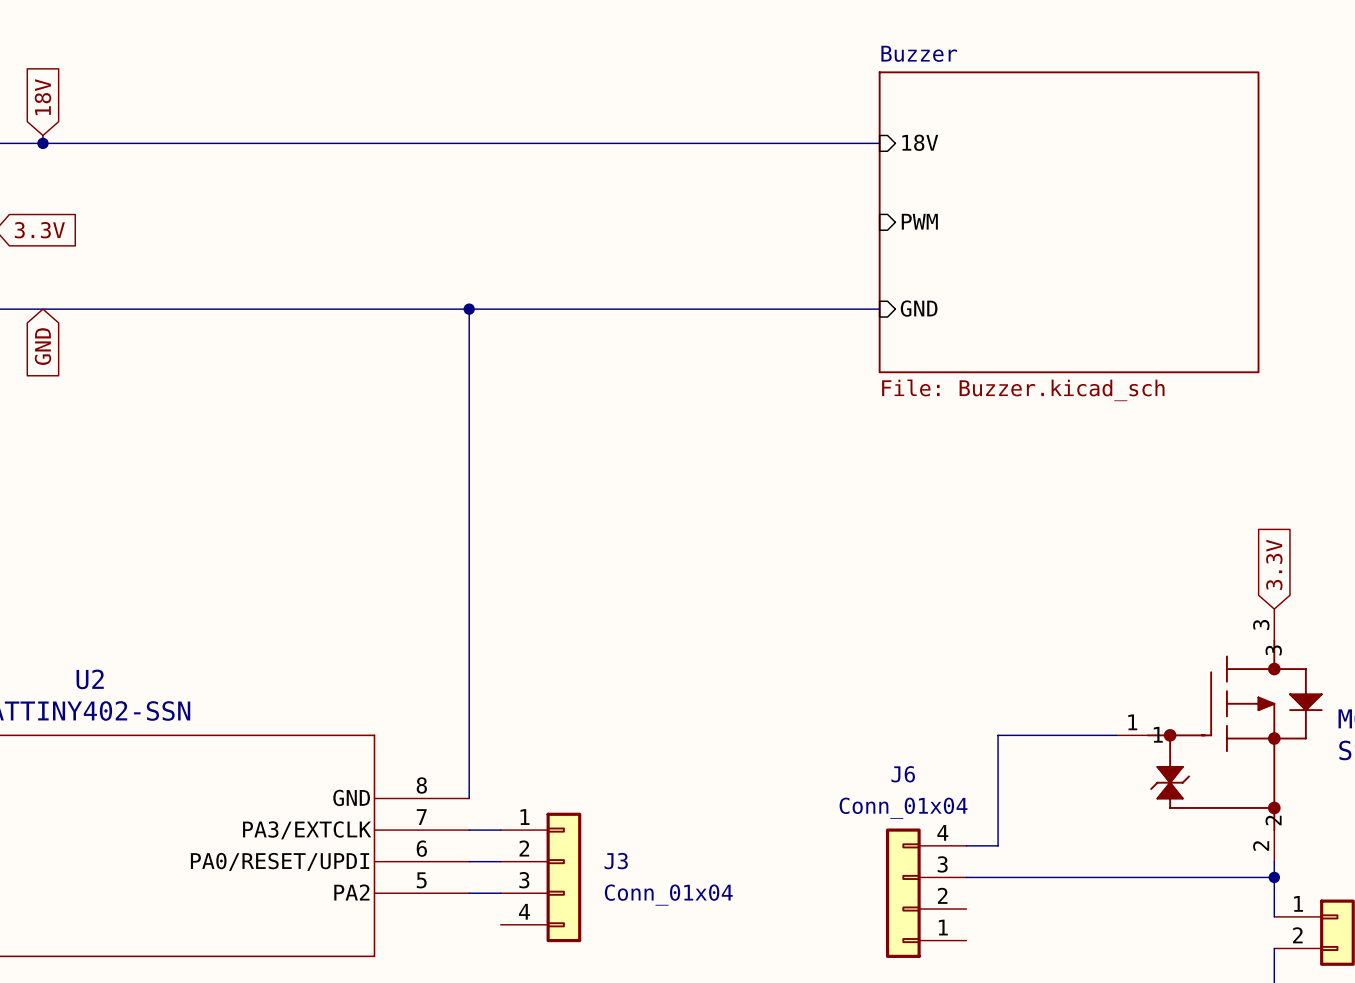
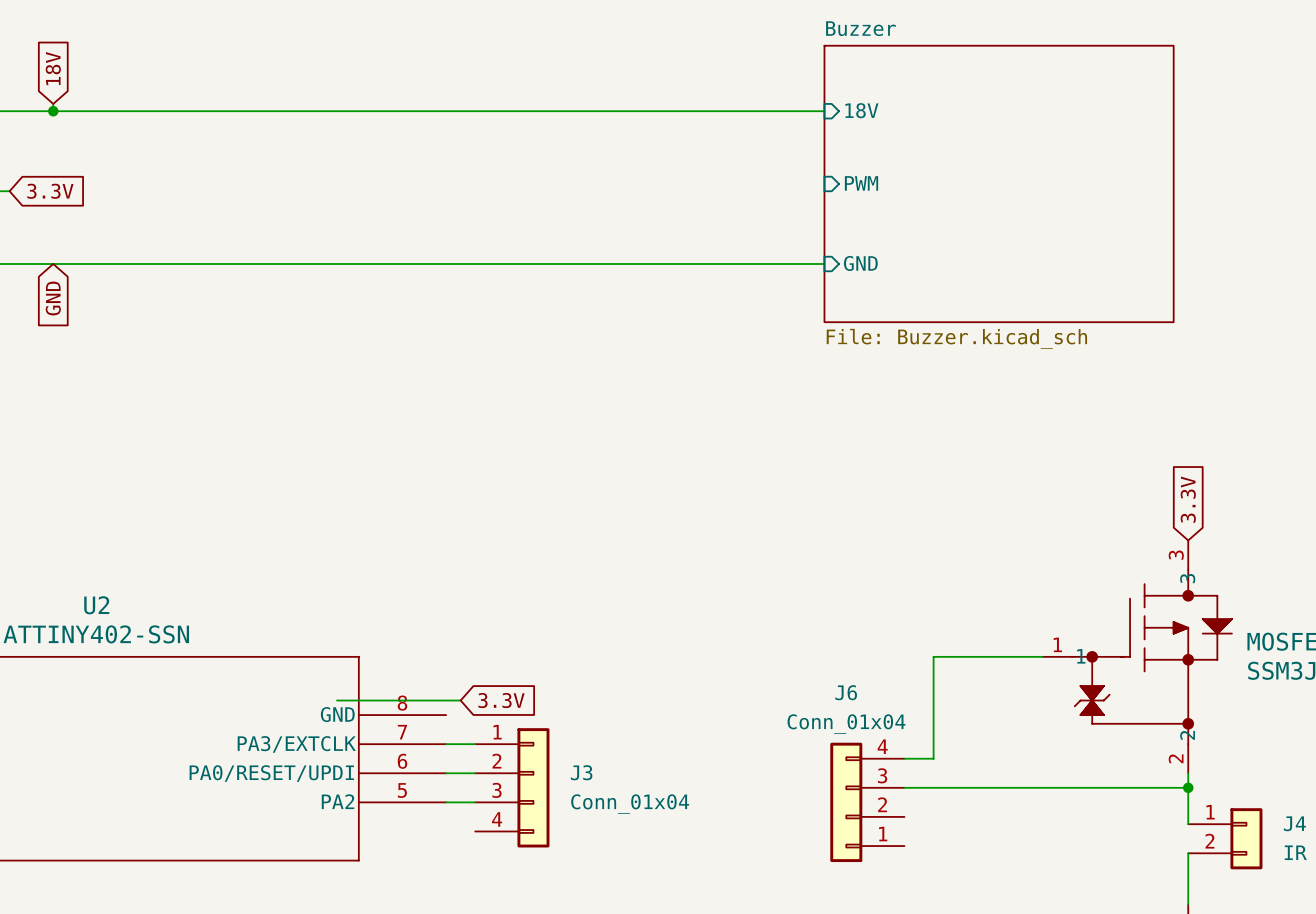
wire: (469, 309) (469, 798) -> none
junction: (469, 309) -> none
wire: none -> (337, 700) (460, 700)
global label: none -> 3.3V (501, 700)

